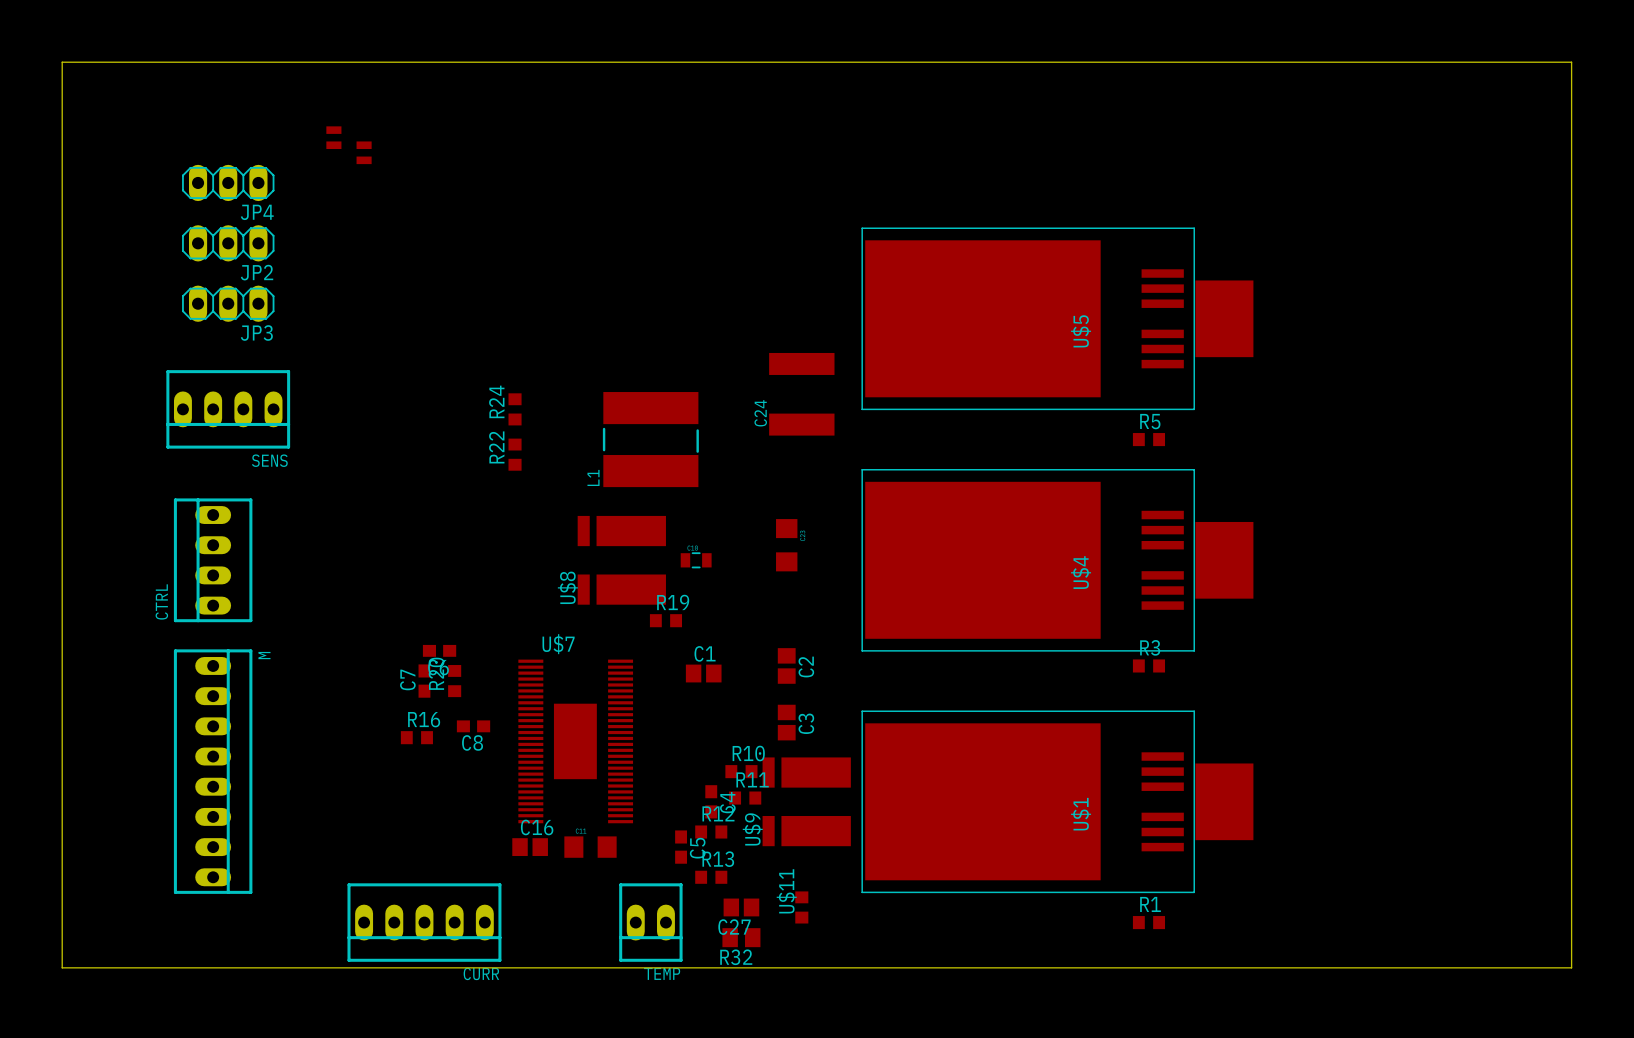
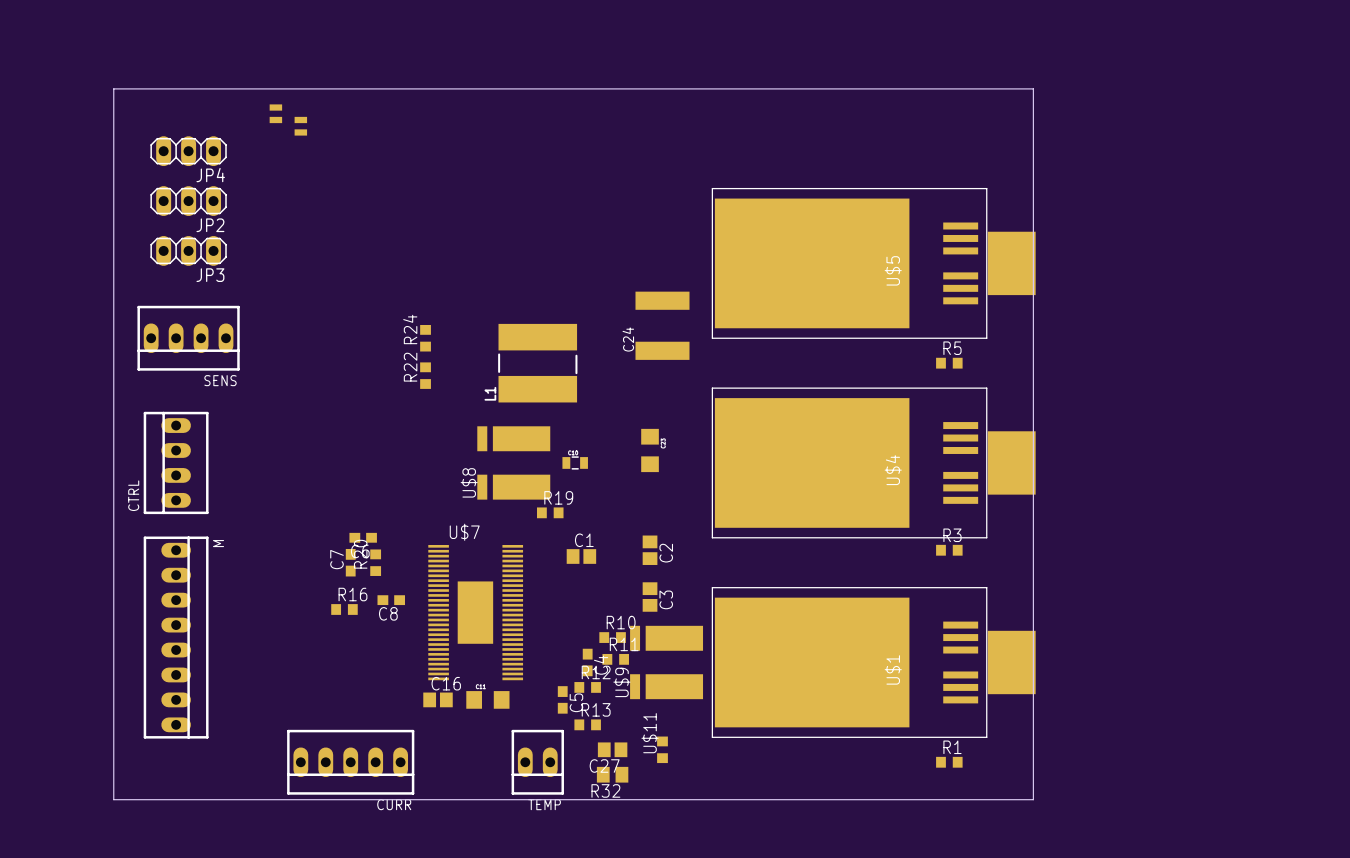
board edge: (137, 967) (62, 967) (62, 62) (1571, 62) (1571, 967) (1250, 967) -> (113, 799) (113, 88) (1033, 88) (1033, 799)

